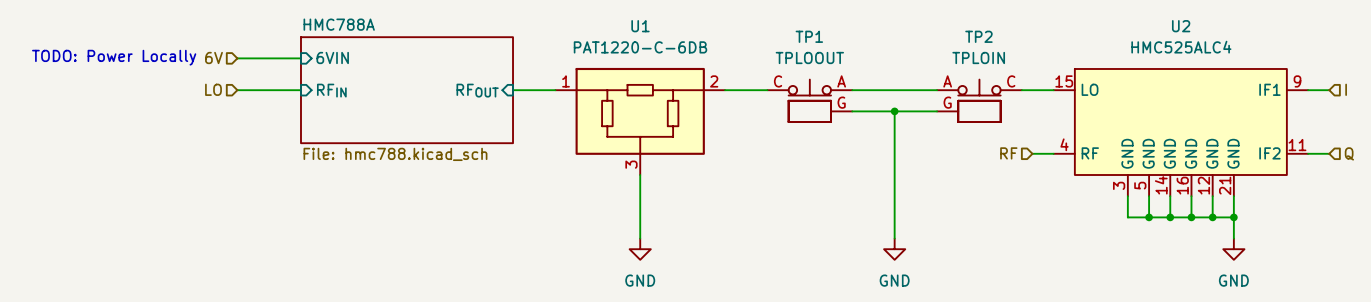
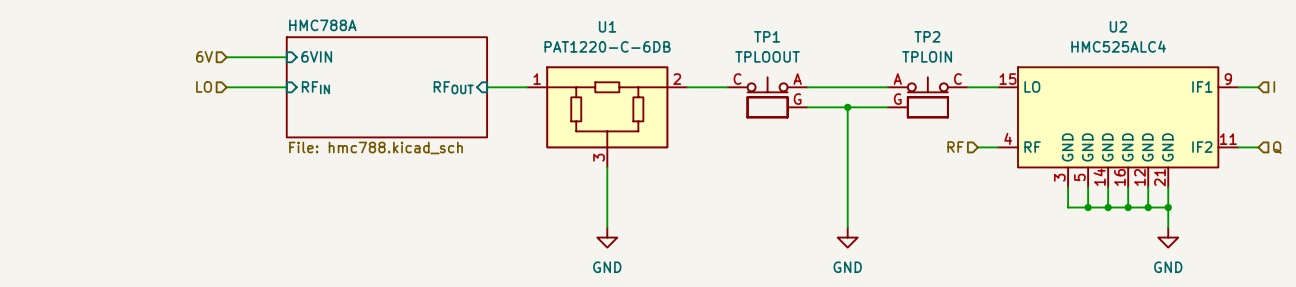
text: TODO: Power Locally (114, 57) -> none

